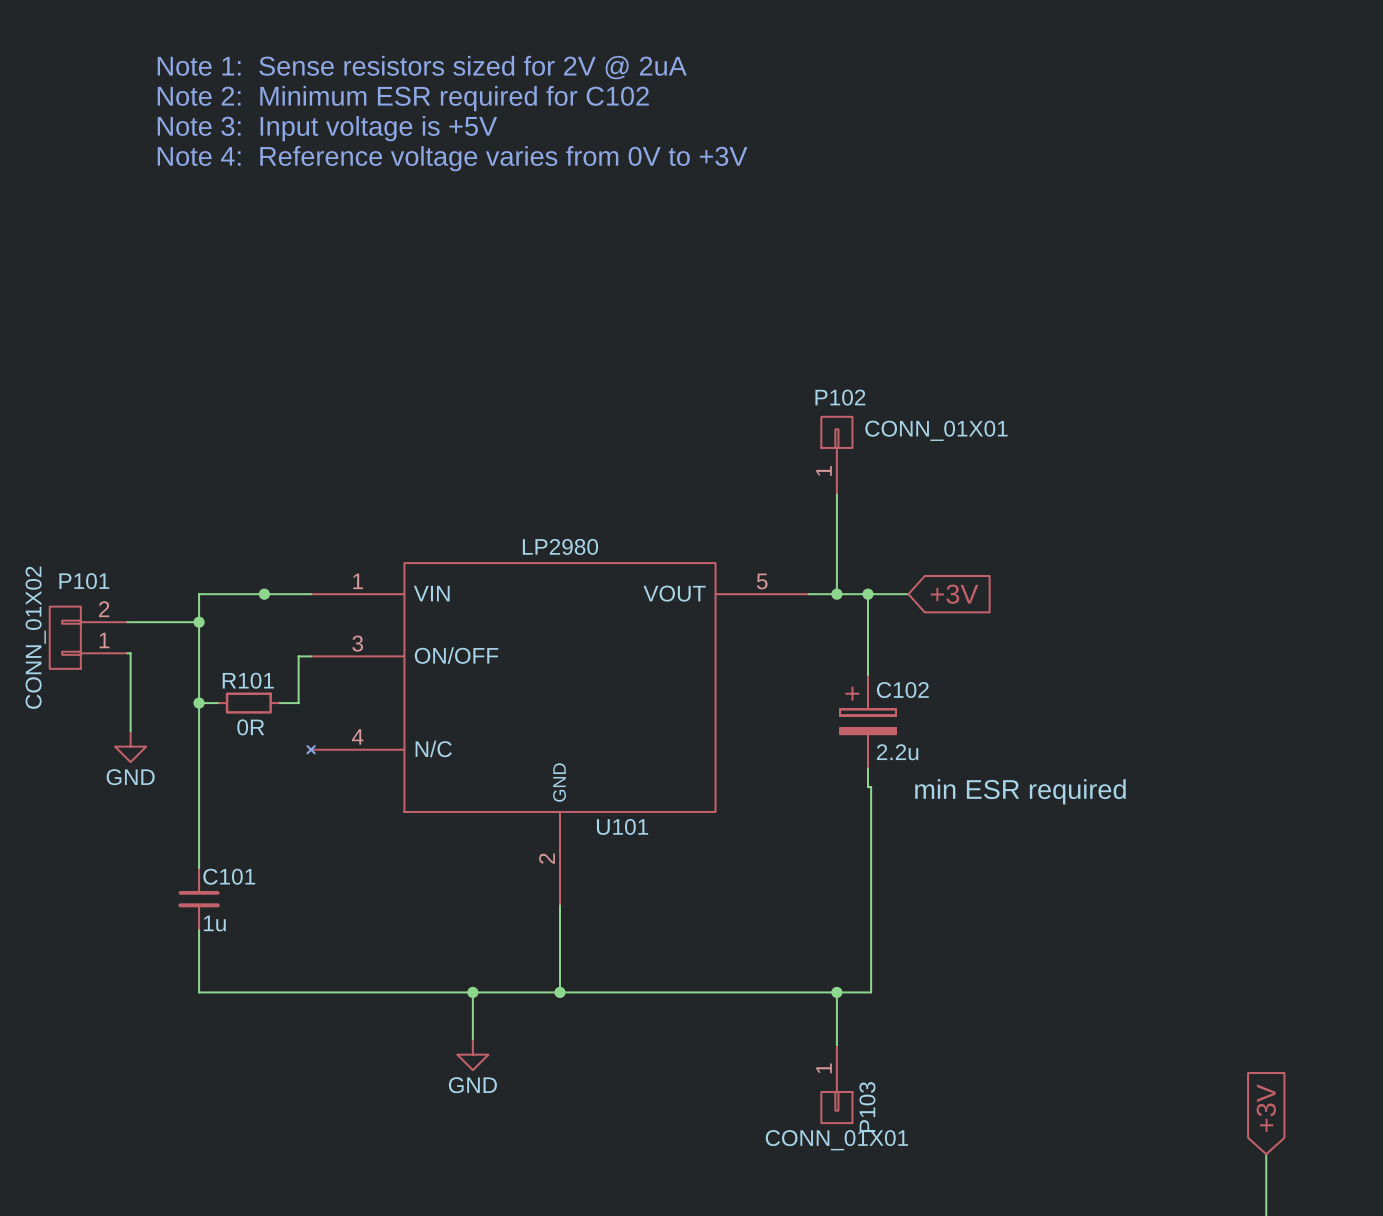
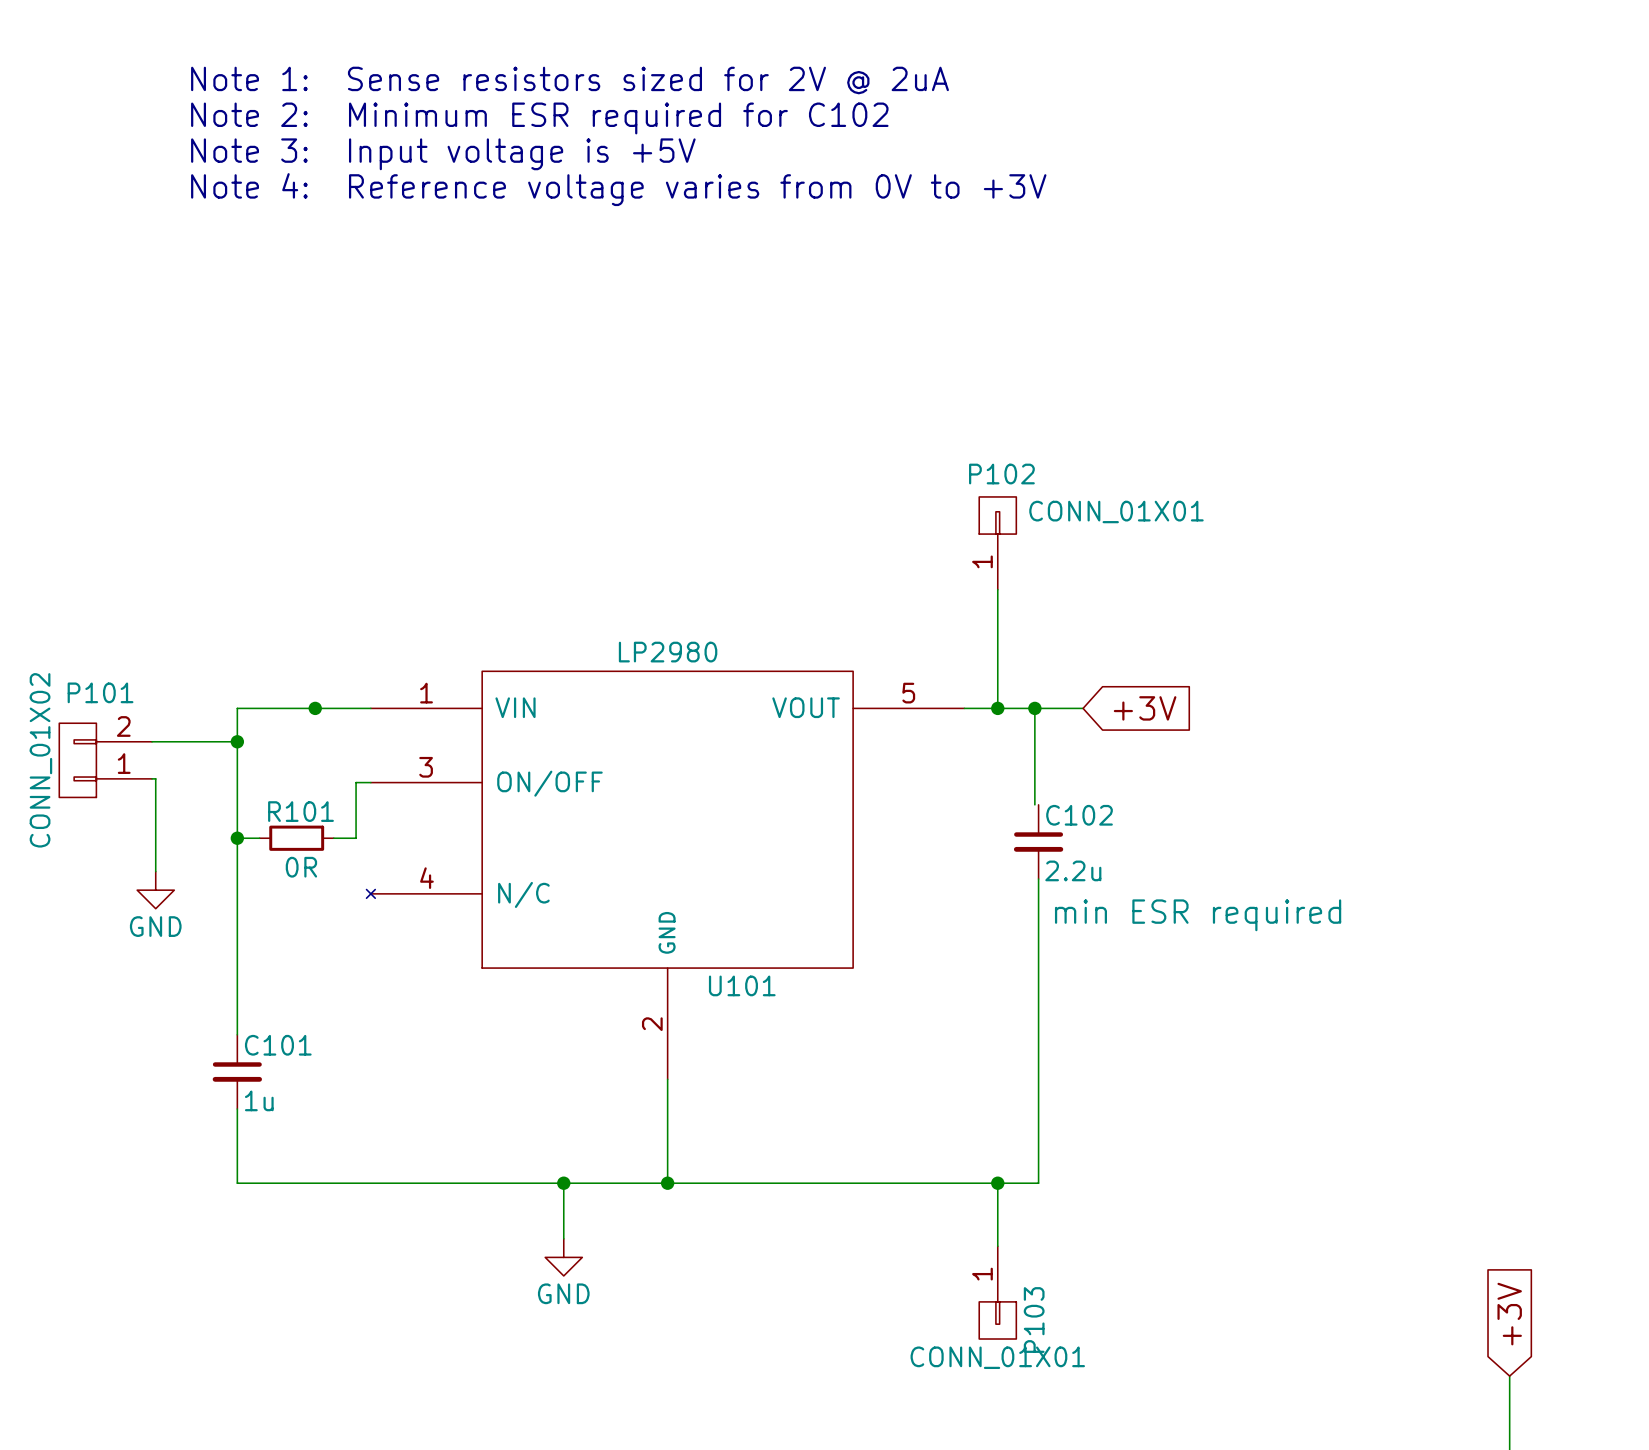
C102 symbol: [840, 675, 897, 769] -> [1013, 804, 1064, 880]
wire: (868, 768) (868, 787) (871, 787) -> (1038, 879) (1038, 938)

